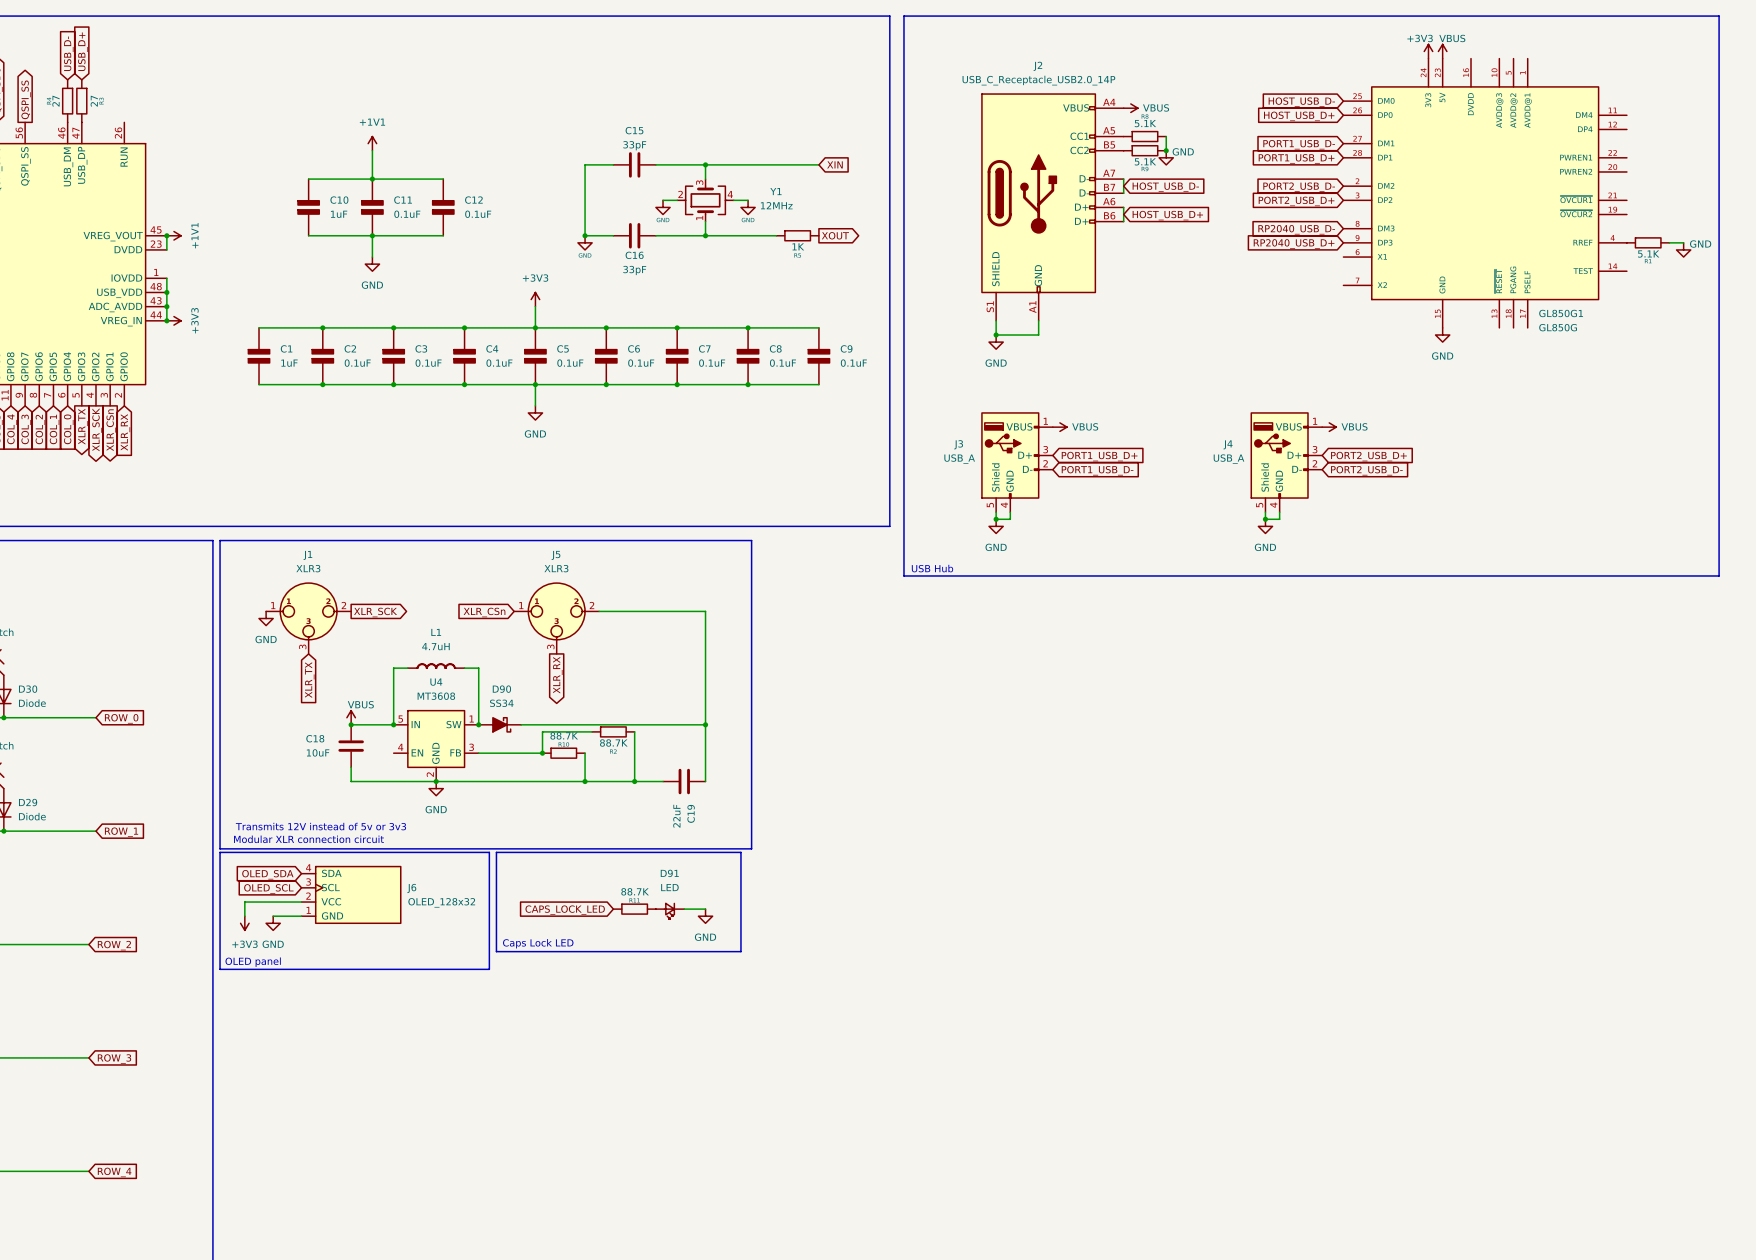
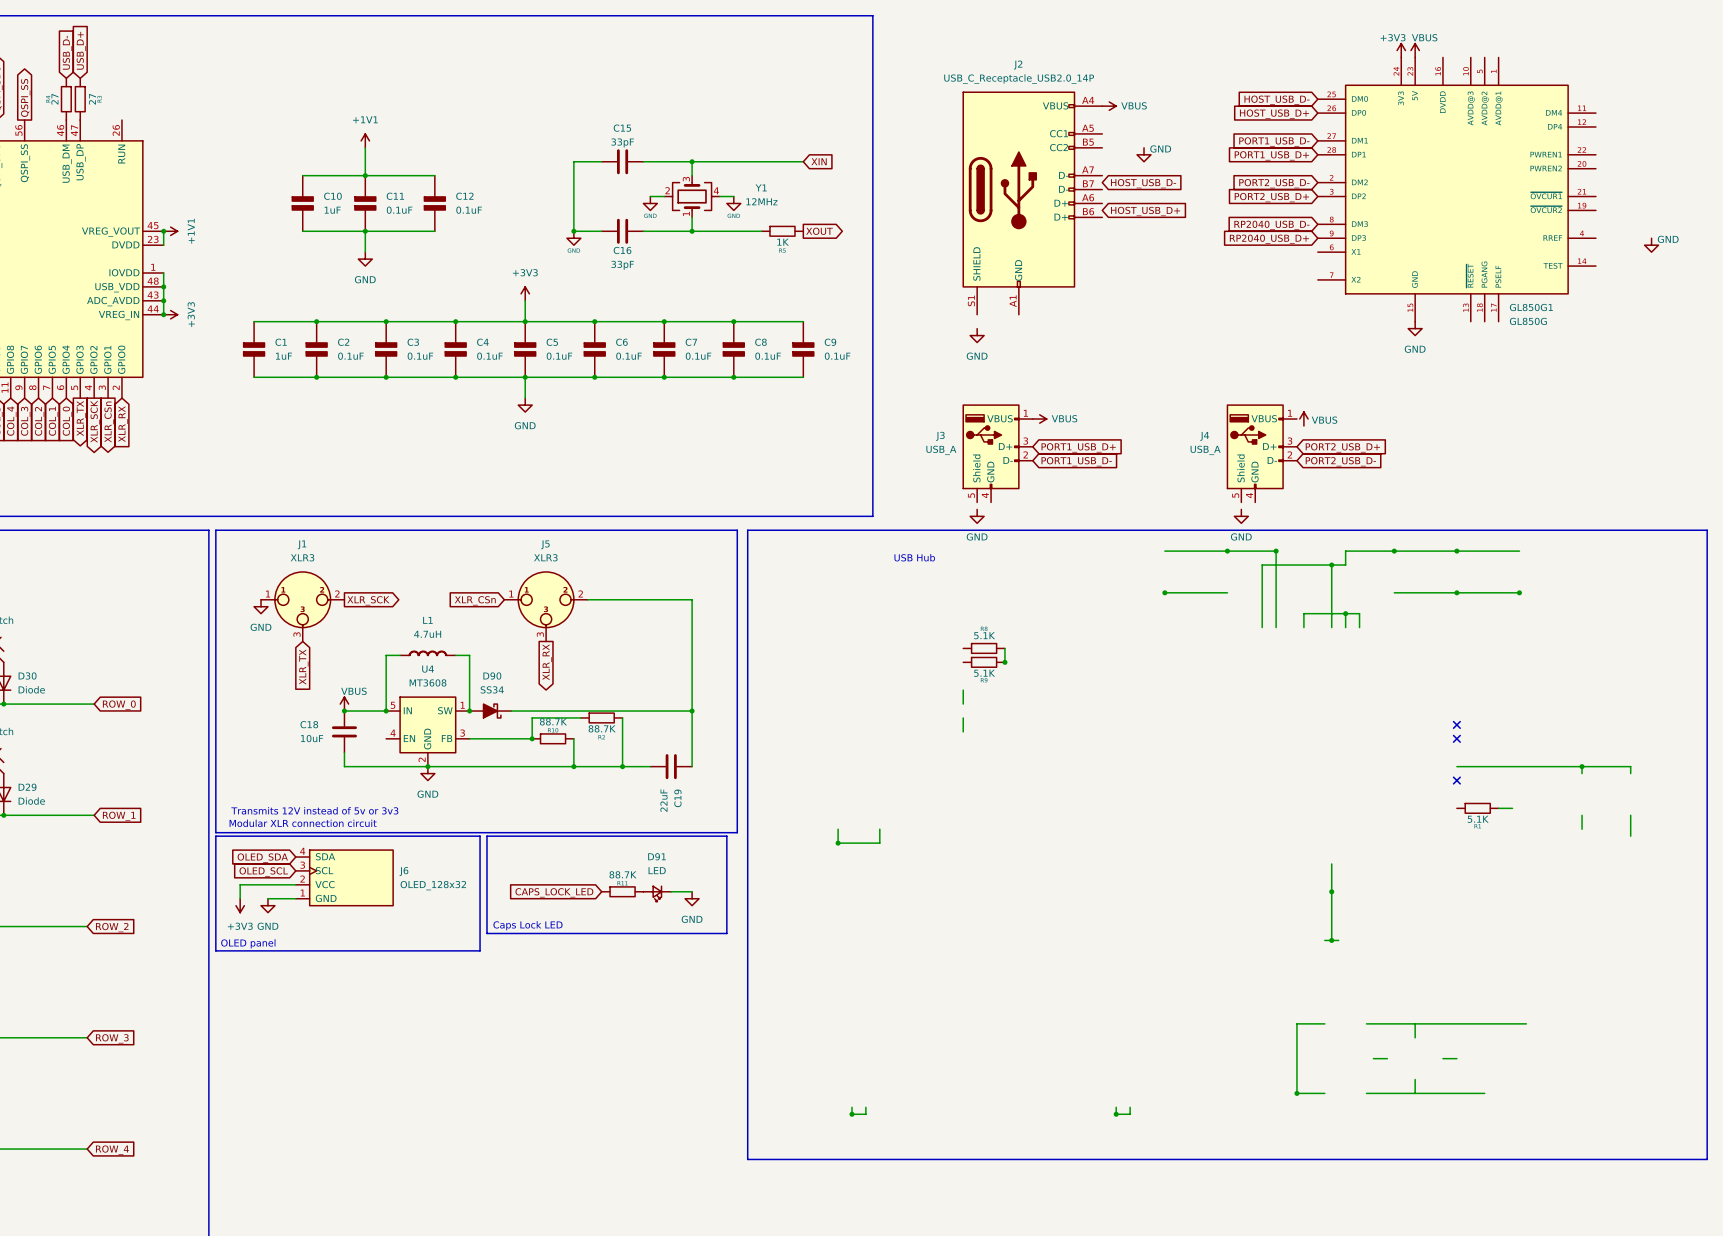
line: (903, 16) (1719, 16) (1719, 575) (903, 575) (903, 16) -> none
part position: (1144, 136) -> (984, 648)
wire: (1166, 136) (1166, 150) -> none
part position: (1144, 150) -> (984, 662)
junction: (1166, 150) -> none
wire: (1123, 179) (1123, 193) -> none
wire: (1123, 207) (1123, 221) -> none
part position: (1648, 242) -> (1477, 808)
wire: (1669, 242) (1683, 242) -> none
wire: (996, 320) (996, 335) (1038, 335) (1038, 320) -> none
junction: (996, 335) -> none
power symbol rotation: 0° (1329, 427) -> 90° counterclockwise (1303, 419)
wire: (996, 512) (996, 519) (1010, 519) (1010, 512) -> none
wire: (1265, 512) (1265, 519) (1279, 519) (1279, 512) -> none
junction: (996, 519) -> none
junction: (1265, 519) -> none
line: none -> (747, 530) (1707, 530) (1707, 1159) (747, 1159) (747, 530)
wire: none -> (1164, 551) (1276, 551) (1276, 627)
junction: none -> (1227, 551)
junction: none -> (1276, 551)
junction: none -> (1394, 551)
junction: none -> (1456, 551)
wire: none -> (1519, 551) (1345, 551) (1345, 565) (1262, 565) (1262, 627)
wire: none -> (1331, 565) (1331, 627)
junction: none -> (1331, 565)
wire: none -> (1164, 592) (1227, 592)
junction: none -> (1164, 592)
wire: none -> (1394, 592) (1519, 592)
junction: none -> (1456, 592)
junction: none -> (1519, 592)
wire: none -> (1345, 613) (1345, 627)
junction: none -> (1345, 613)
wire: none -> (1303, 627) (1303, 613) (1359, 613) (1359, 627)
wire: none -> (1004, 648) (1004, 662)
junction: none -> (1004, 662)
wire: none -> (963, 690) (963, 704)
wire: none -> (963, 717) (963, 731)
no-connect mark: none -> (1456, 724)
no-connect mark: none -> (1456, 738)
wire: none -> (1456, 766) (1630, 766) (1630, 773)
wire: none -> (1582, 766) (1582, 773)
junction: none -> (1582, 766)
no-connect mark: none -> (1456, 780)
wire: none -> (1498, 808) (1512, 808)
wire: none -> (1582, 815) (1582, 829)
wire: none -> (1630, 815) (1630, 836)
wire: none -> (838, 829) (838, 843) (879, 843) (879, 829)
junction: none -> (838, 843)
wire: none -> (1331, 863) (1331, 940)
junction: none -> (1331, 891)
wire: none -> (1324, 940) (1338, 940)
junction: none -> (1331, 940)
wire: none -> (1324, 1023) (1296, 1023) (1296, 1093) (1324, 1093)
wire: none -> (1366, 1023) (1526, 1023)
wire: none -> (1415, 1023) (1415, 1037)
wire: none -> (1373, 1058) (1387, 1058)
wire: none -> (1442, 1058) (1456, 1058)
wire: none -> (1415, 1079) (1415, 1093)
junction: none -> (1296, 1093)
wire: none -> (1366, 1093) (1484, 1093)
wire: none -> (852, 1107) (852, 1114) (865, 1114) (865, 1107)
wire: none -> (1116, 1107) (1116, 1114) (1130, 1114) (1130, 1107)
junction: none -> (852, 1114)
junction: none -> (1116, 1114)

